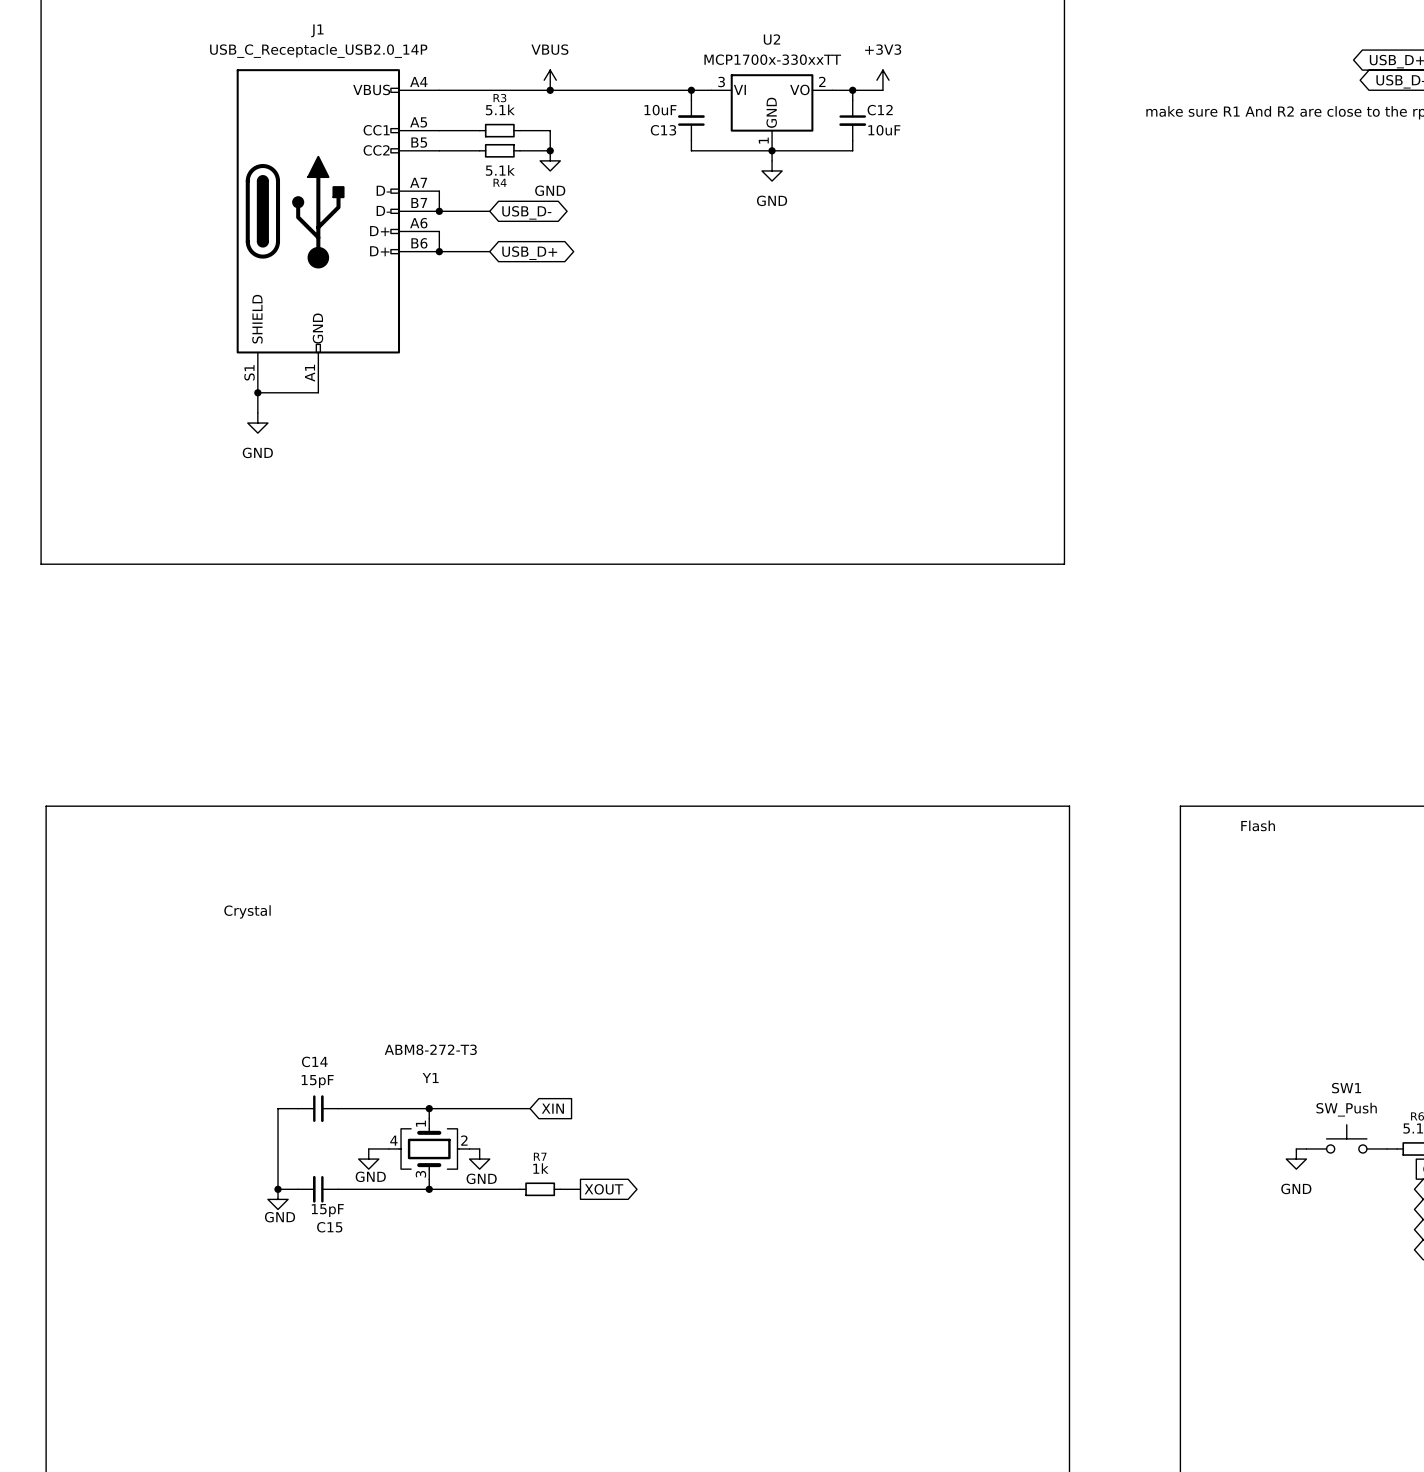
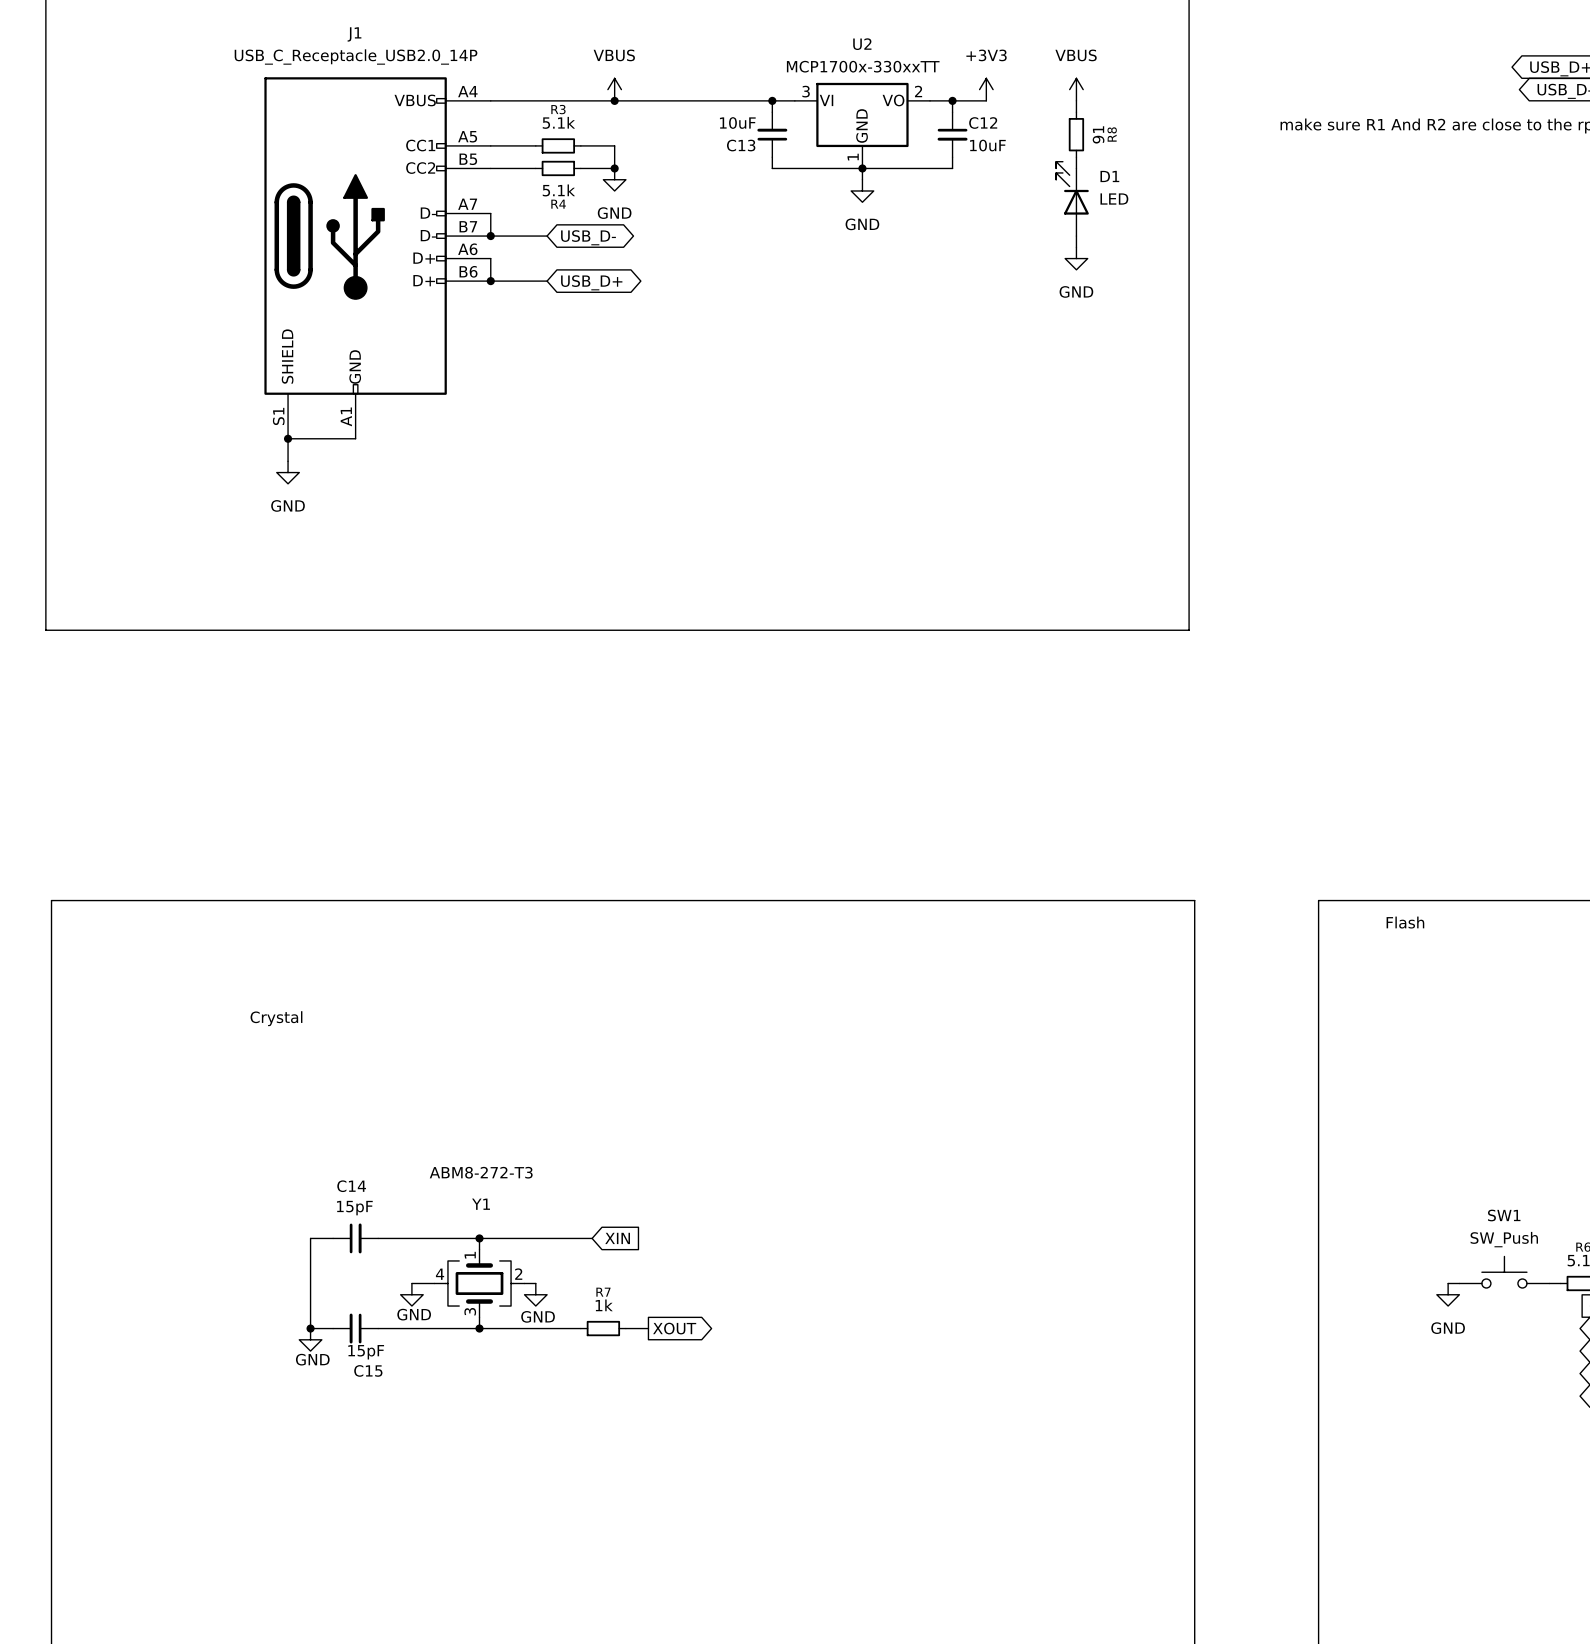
power symbol: none -> VBUS (1076, 89)
wire: none -> (1076, 100) (1076, 112)
R8: none -> 91 (1076, 134)
wire: none -> (1076, 157) (1076, 168)
D1: none -> LED (1072, 198)
wire: none -> (1076, 236) (1076, 247)
power symbol: none -> GND (1076, 258)

